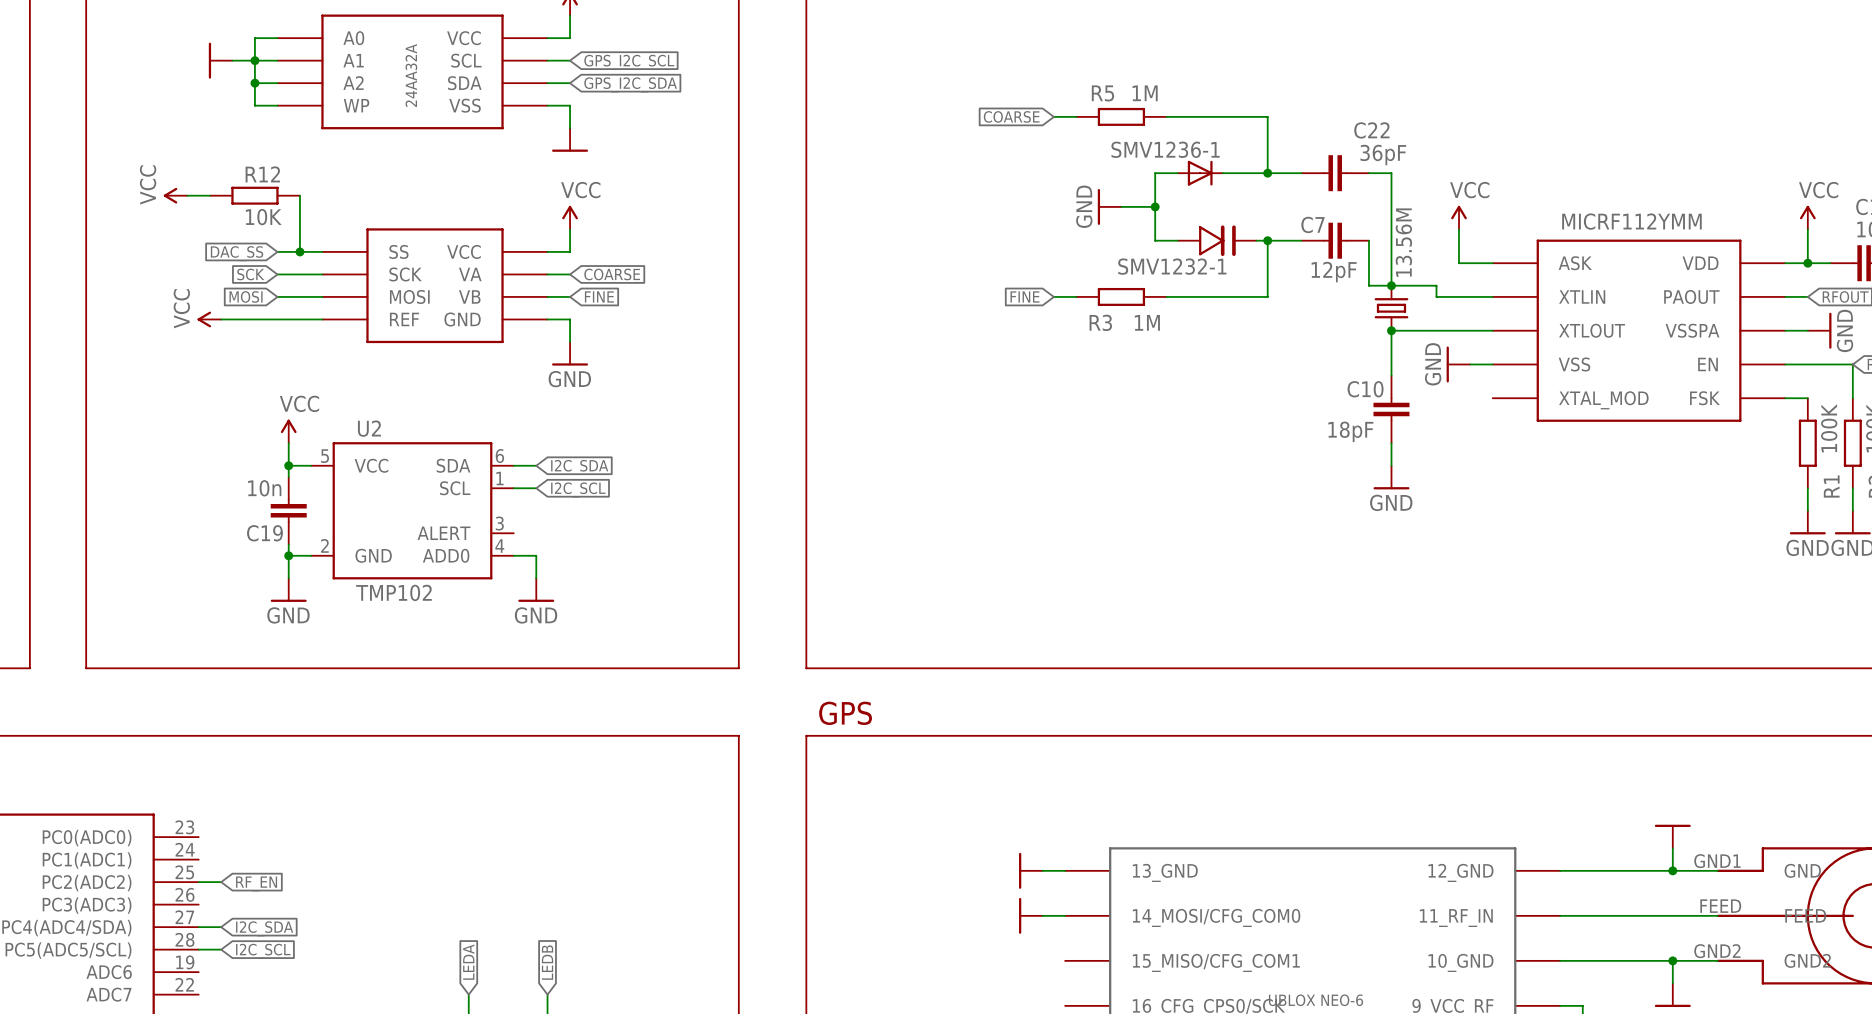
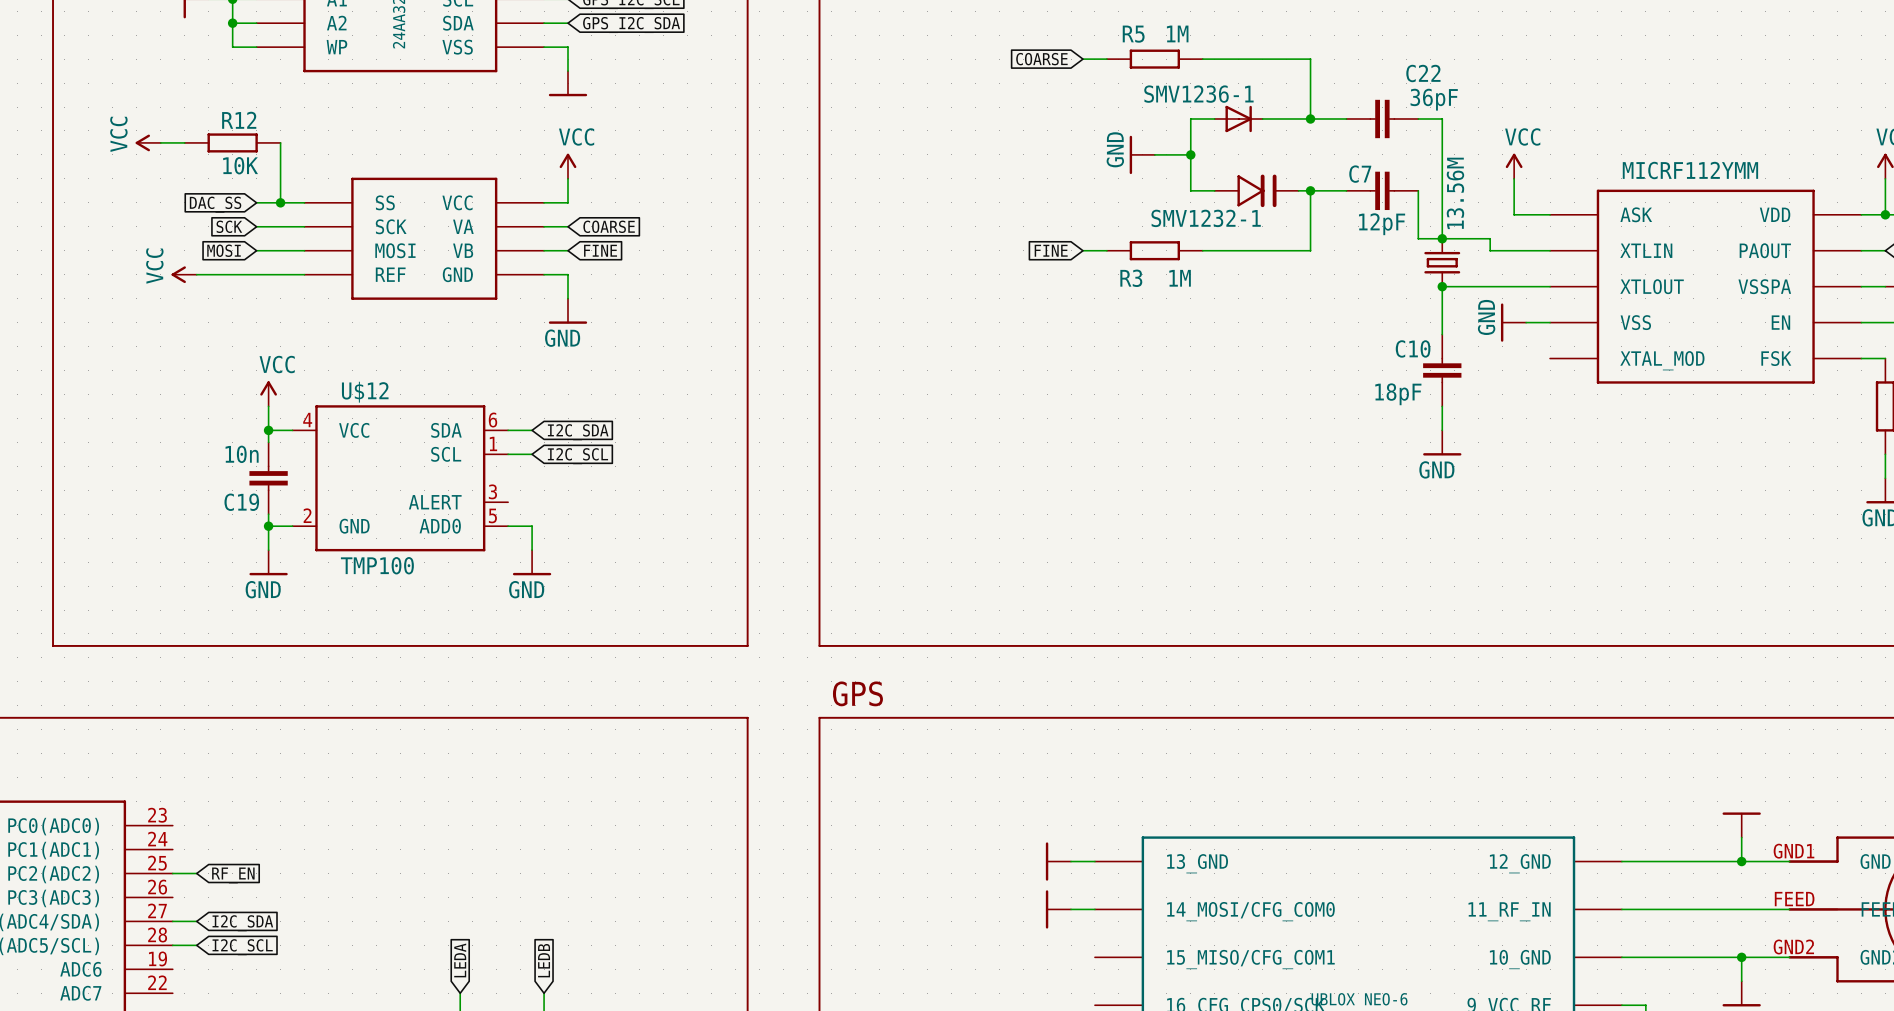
U2 name: U2 (369, 428) -> U$12 (365, 392)
U2 pin number: 5 (325, 456) -> 4 (307, 420)
U2 pin number: 4 (499, 546) -> 5 (492, 515)
U2 value: TMP102 (393, 592) -> TMP100 (377, 565)

